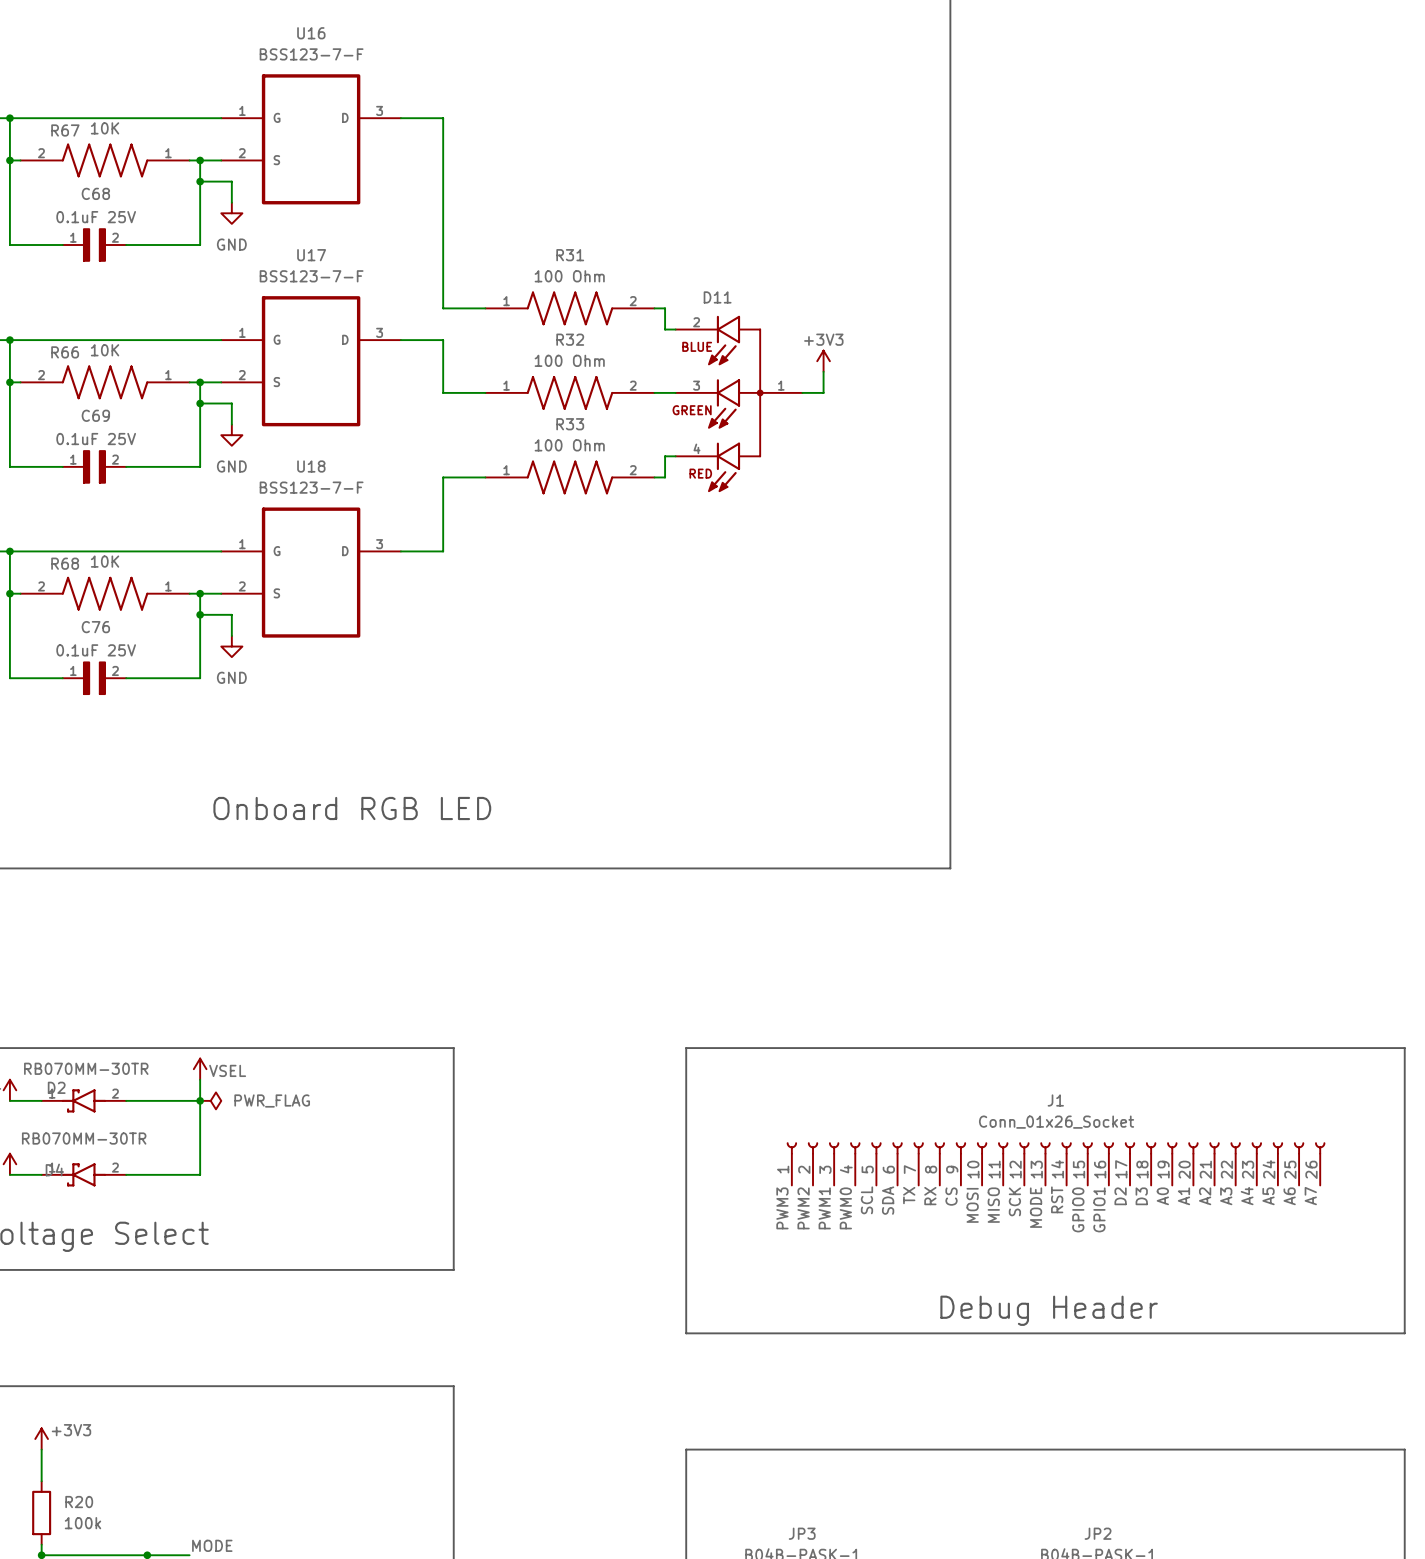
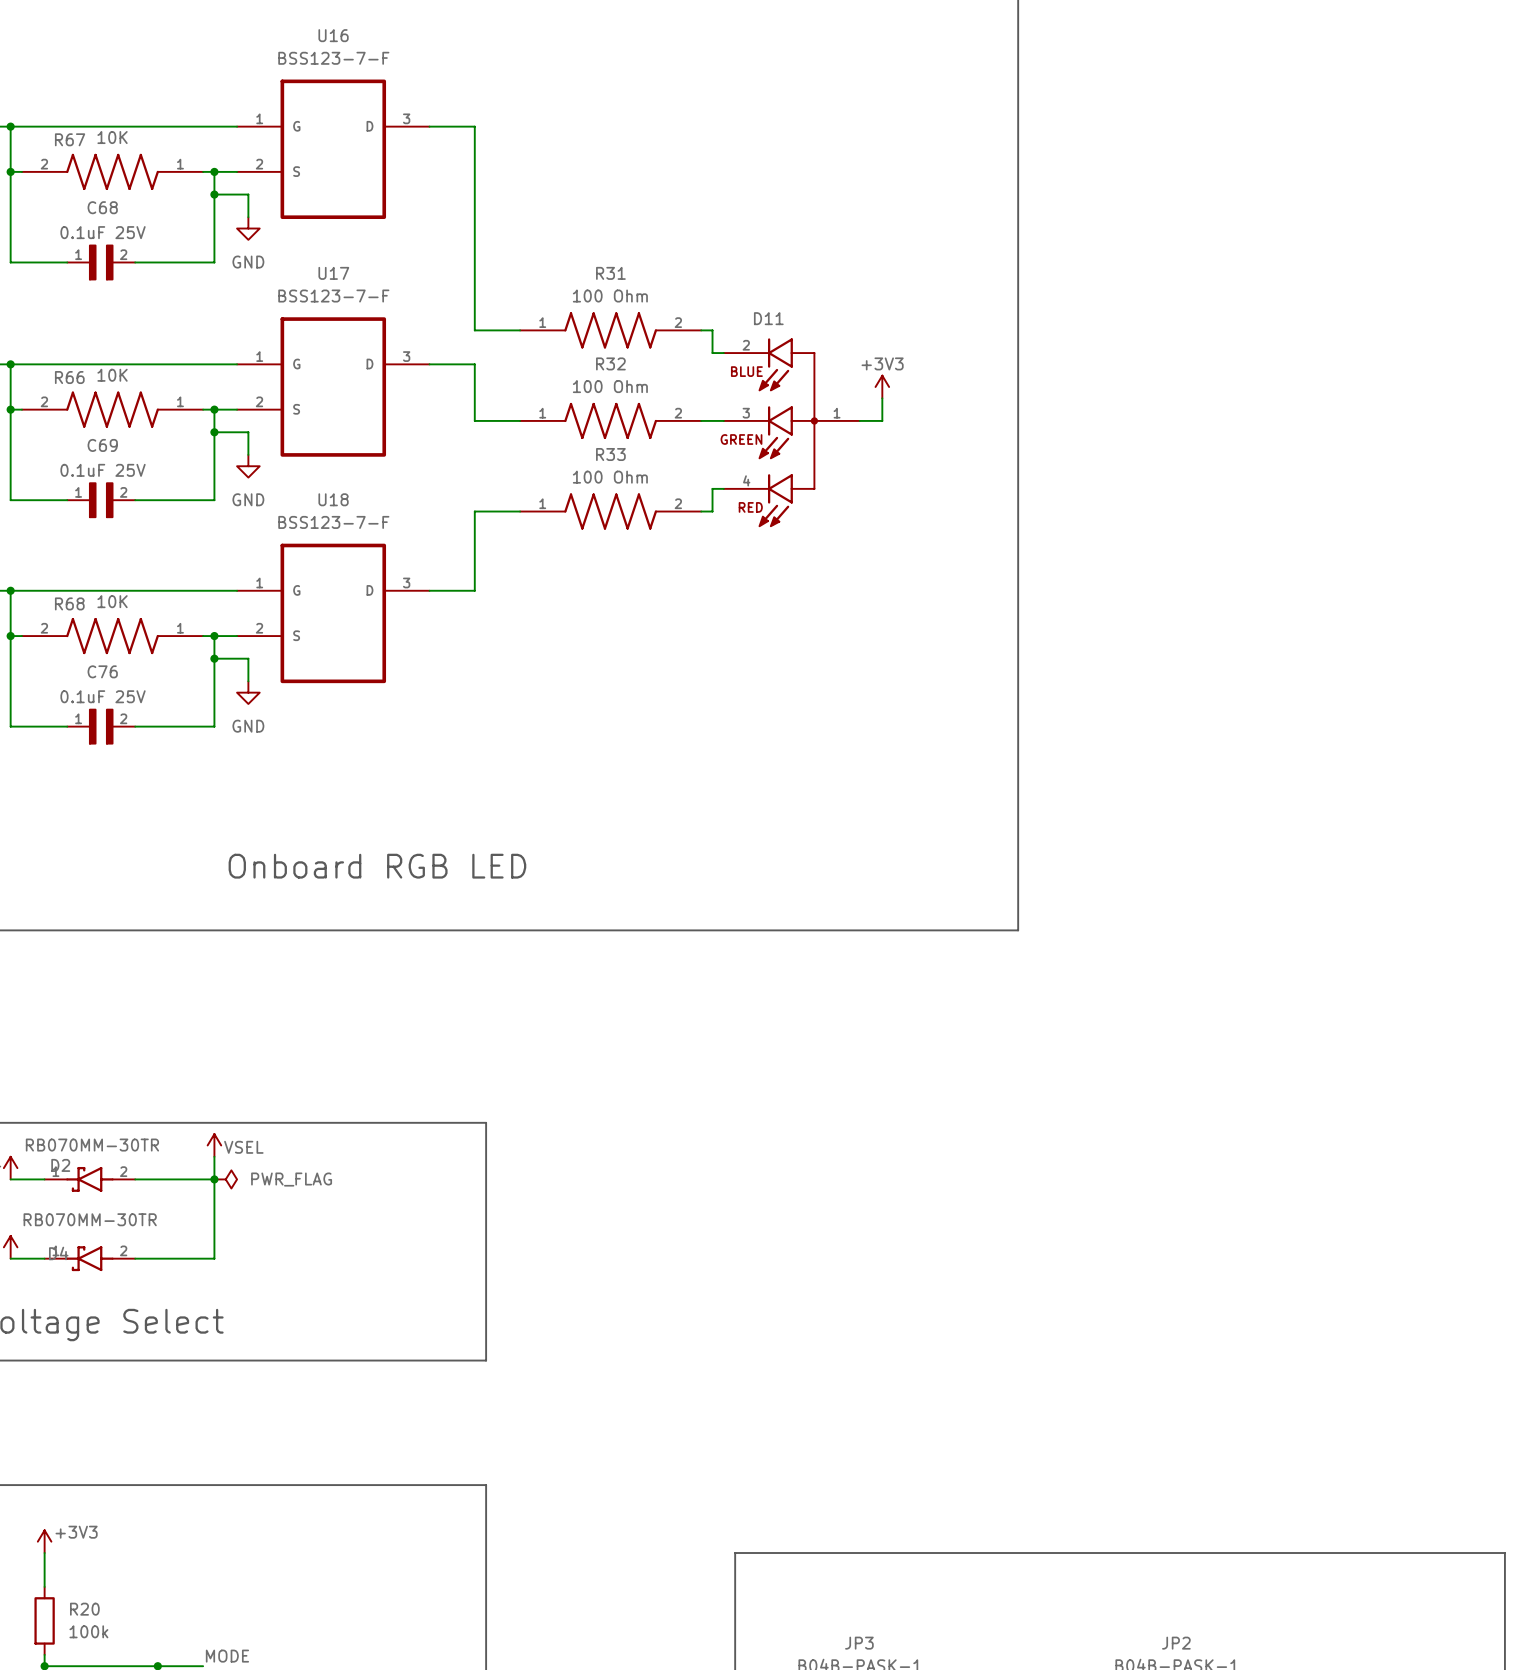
line: (686, 1048) (1404, 1048) (1404, 1333) (686, 1333) (686, 1048) -> none
J1: Conn_01x26_Socket (1056, 1163) -> none
label: TX (909, 1195) -> none
label: RX (930, 1196) -> none
label: CS (951, 1196) -> none
label: D2 (1120, 1196) -> none
label: D3 (1141, 1196) -> none
label: A0 (1162, 1196) -> none
label: A1 (1183, 1196) -> none
label: A2 (1205, 1196) -> none
label: A3 (1226, 1196) -> none
label: A4 (1247, 1196) -> none
label: A5 (1268, 1196) -> none
label: A6 (1289, 1196) -> none
label: A7 (1310, 1196) -> none
label: RST (1057, 1199) -> none
label: SCL (866, 1200) -> none
label: SDA (888, 1200) -> none
label: SCK (1014, 1201) -> none
label: MOSI (972, 1205) -> none
label: MISO (993, 1205) -> none
label: MODE (1036, 1207) -> none
label: PWM3 (782, 1208) -> none
label: PWM2 (803, 1208) -> none
label: PWM1 (824, 1208) -> none
label: PWM0 (845, 1208) -> none
label: GPIO0 (1078, 1209) -> none
label: GPIO1 (1099, 1209) -> none
text: Debug Header (1049, 1310) -> none

